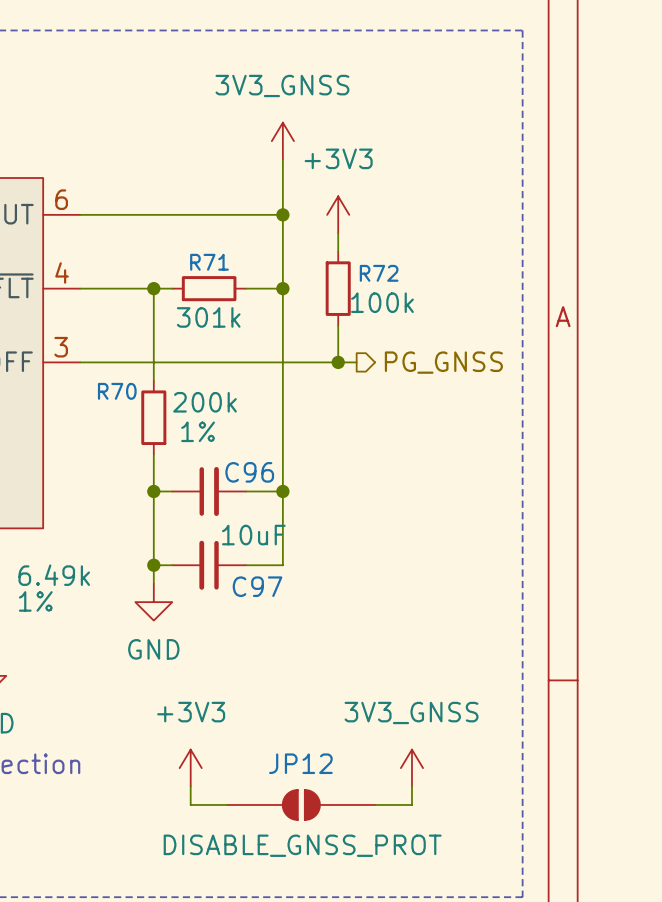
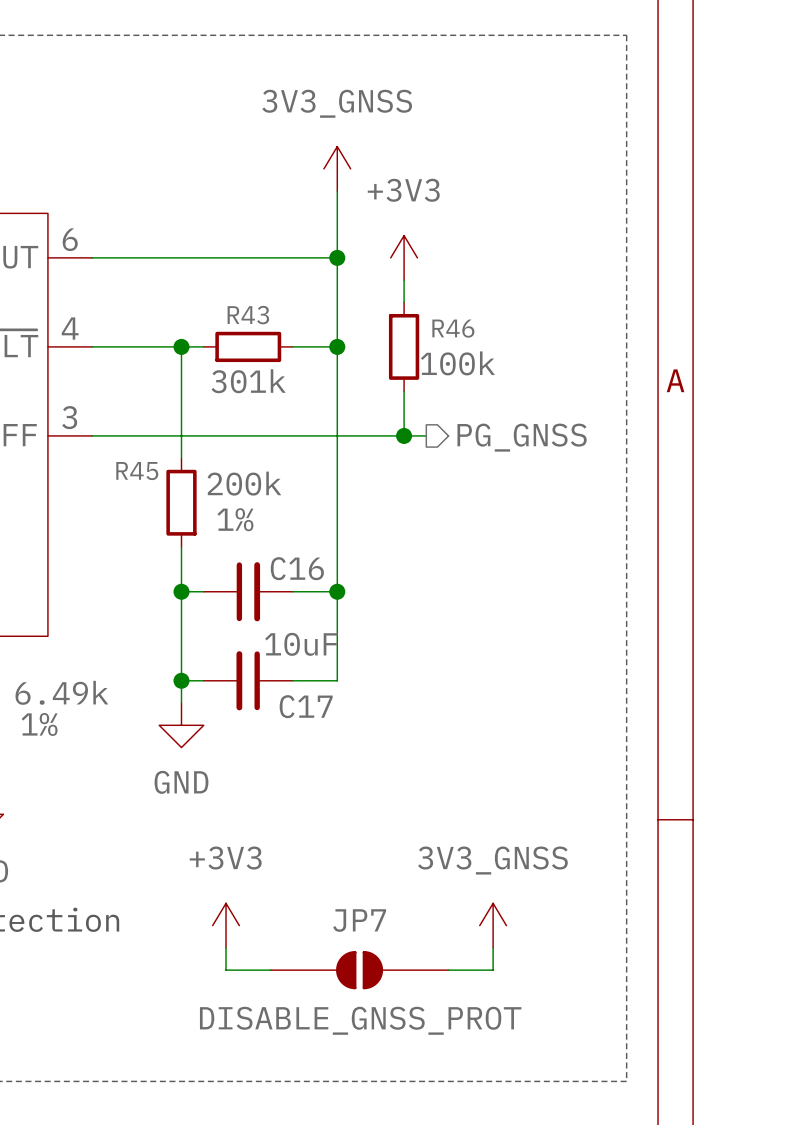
R71 name: R71 (209, 262) -> R43 (248, 315)
R72 name: R72 (379, 273) -> R46 (453, 328)
R70 name: R70 (117, 391) -> R45 (137, 471)
C96 name: C96 (249, 472) -> C16 (297, 568)
C97 name: C97 (257, 586) -> C17 (306, 706)
JP12 name: JP12 (300, 763) -> JP7 (359, 920)

